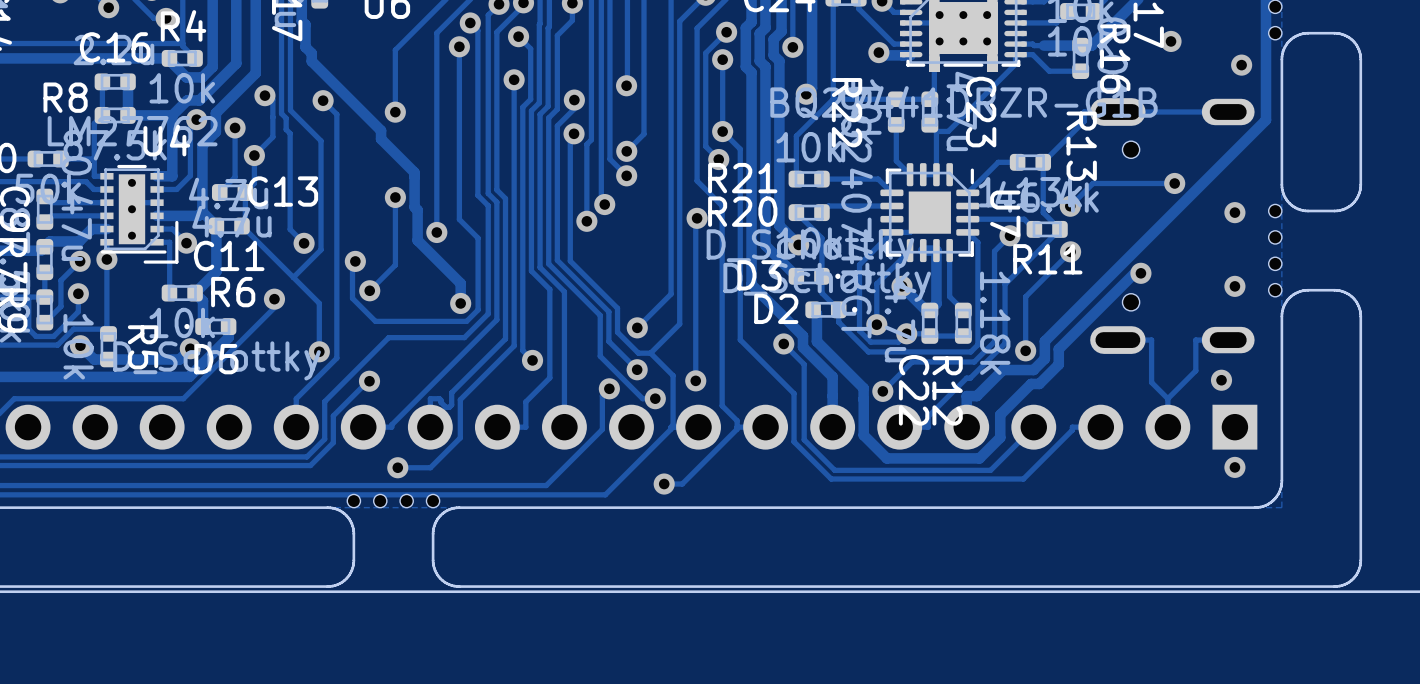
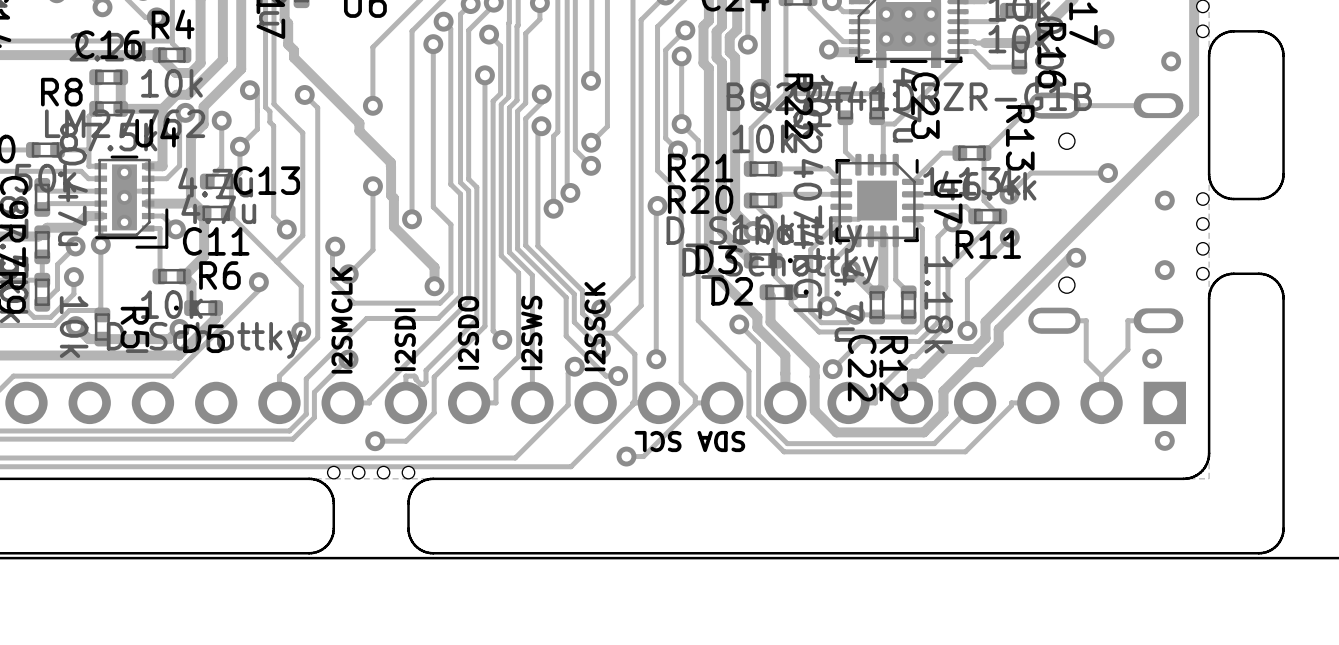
text: none -> I2SMCLK (342, 320)
text: none -> I2SSCK (594, 326)
text: none -> I2SDO (468, 332)
text: none -> I2SWS (531, 332)
text: none -> I2SDI (405, 339)
text: none -> SCL (658, 441)
text: none -> SDA (721, 441)

